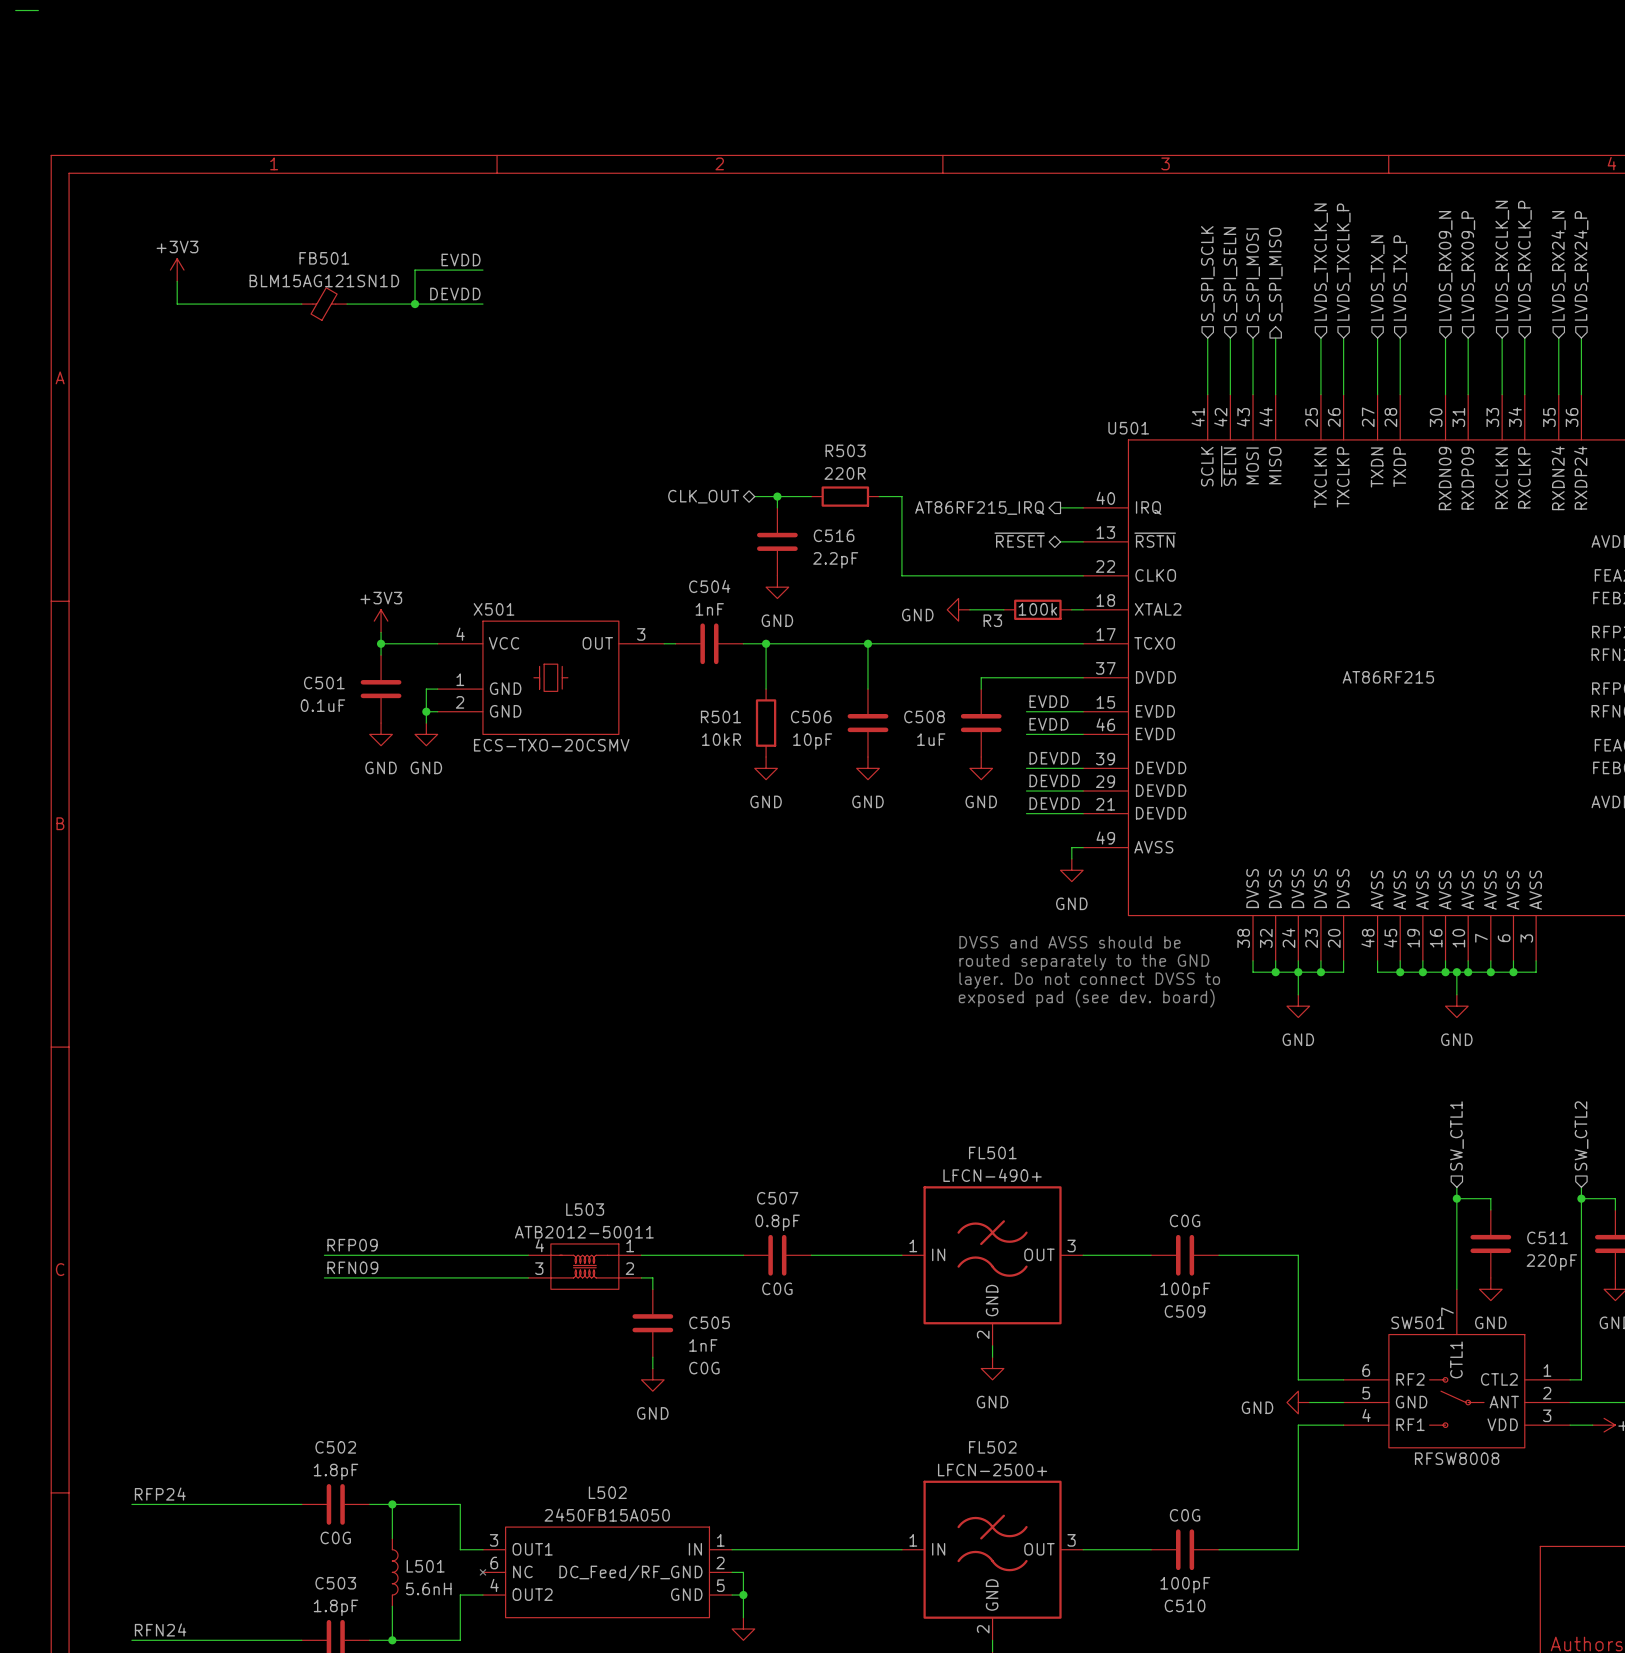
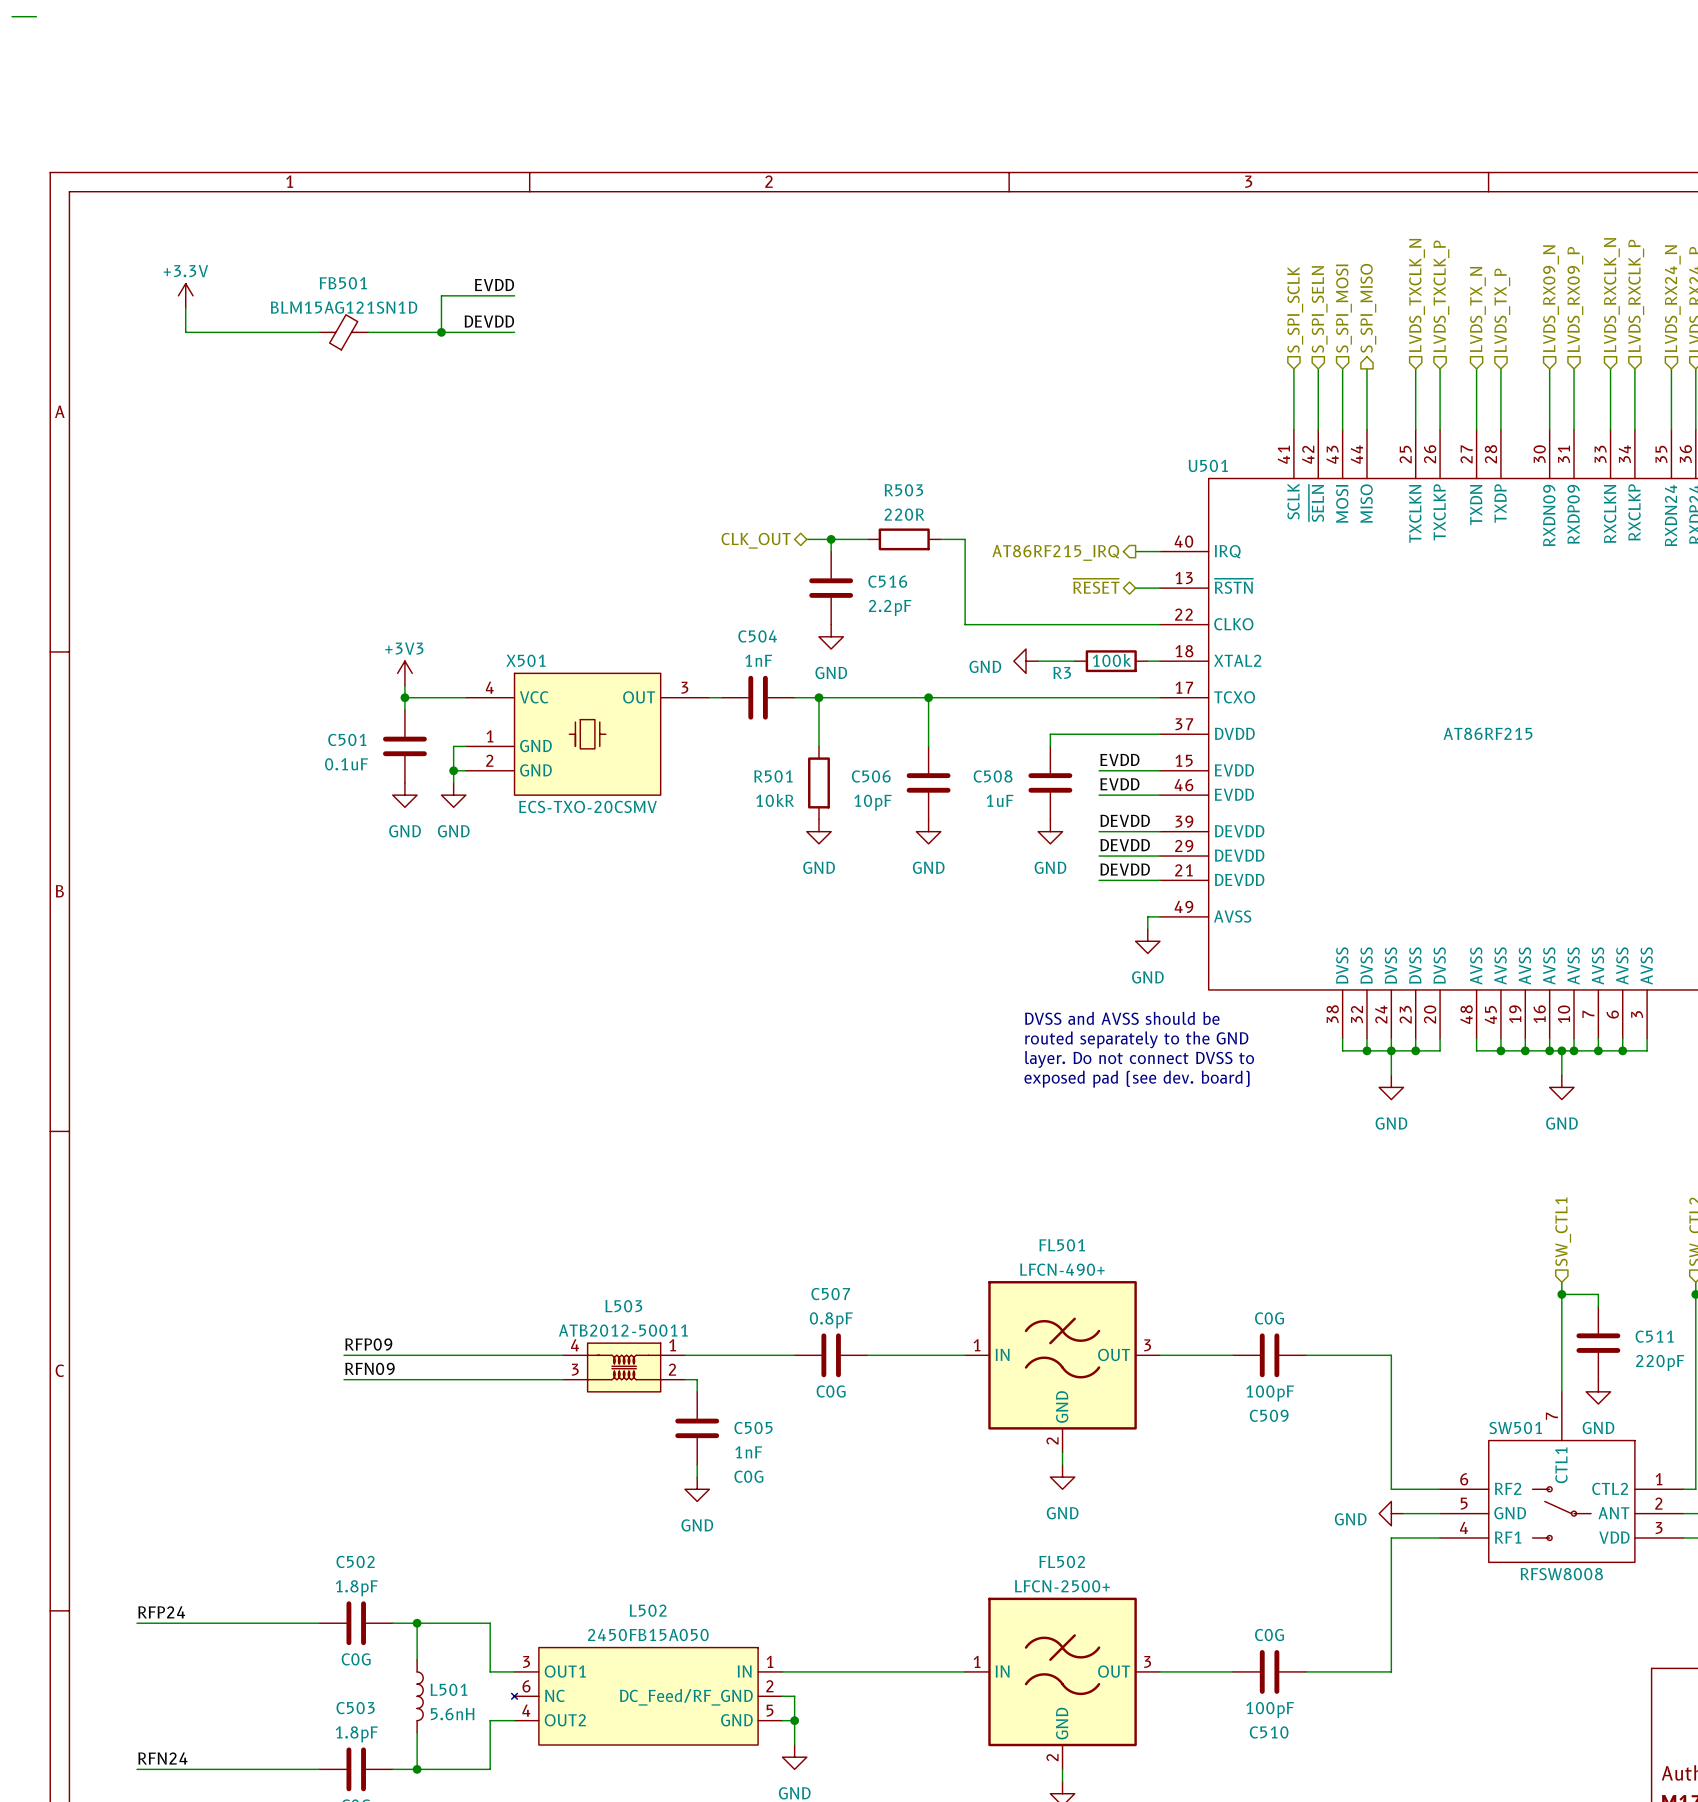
power symbol: +3V3 (177, 270) -> +3.3V (185, 295)

